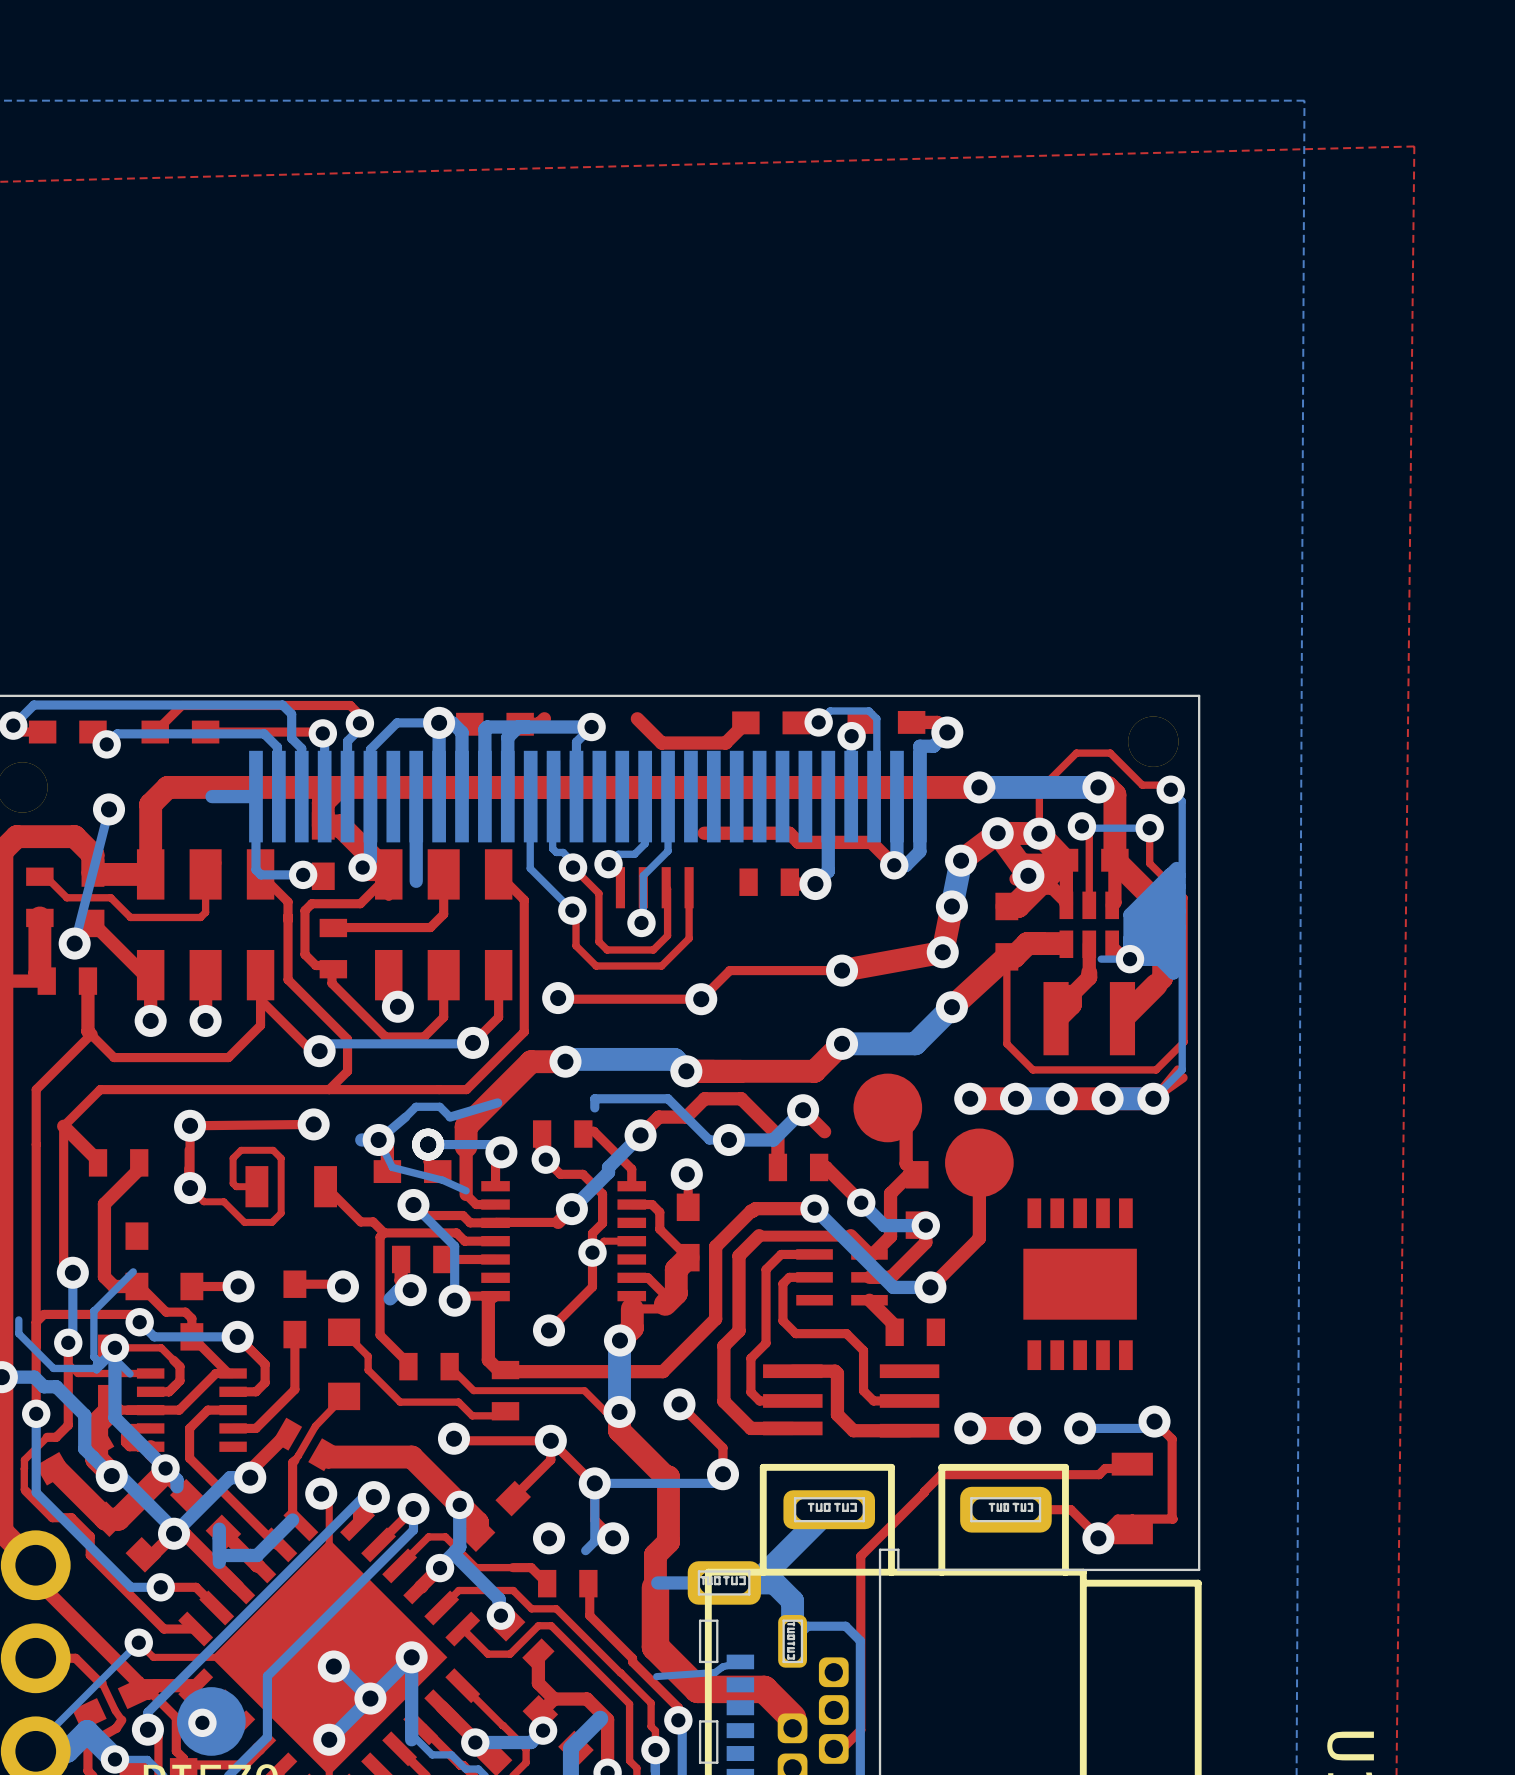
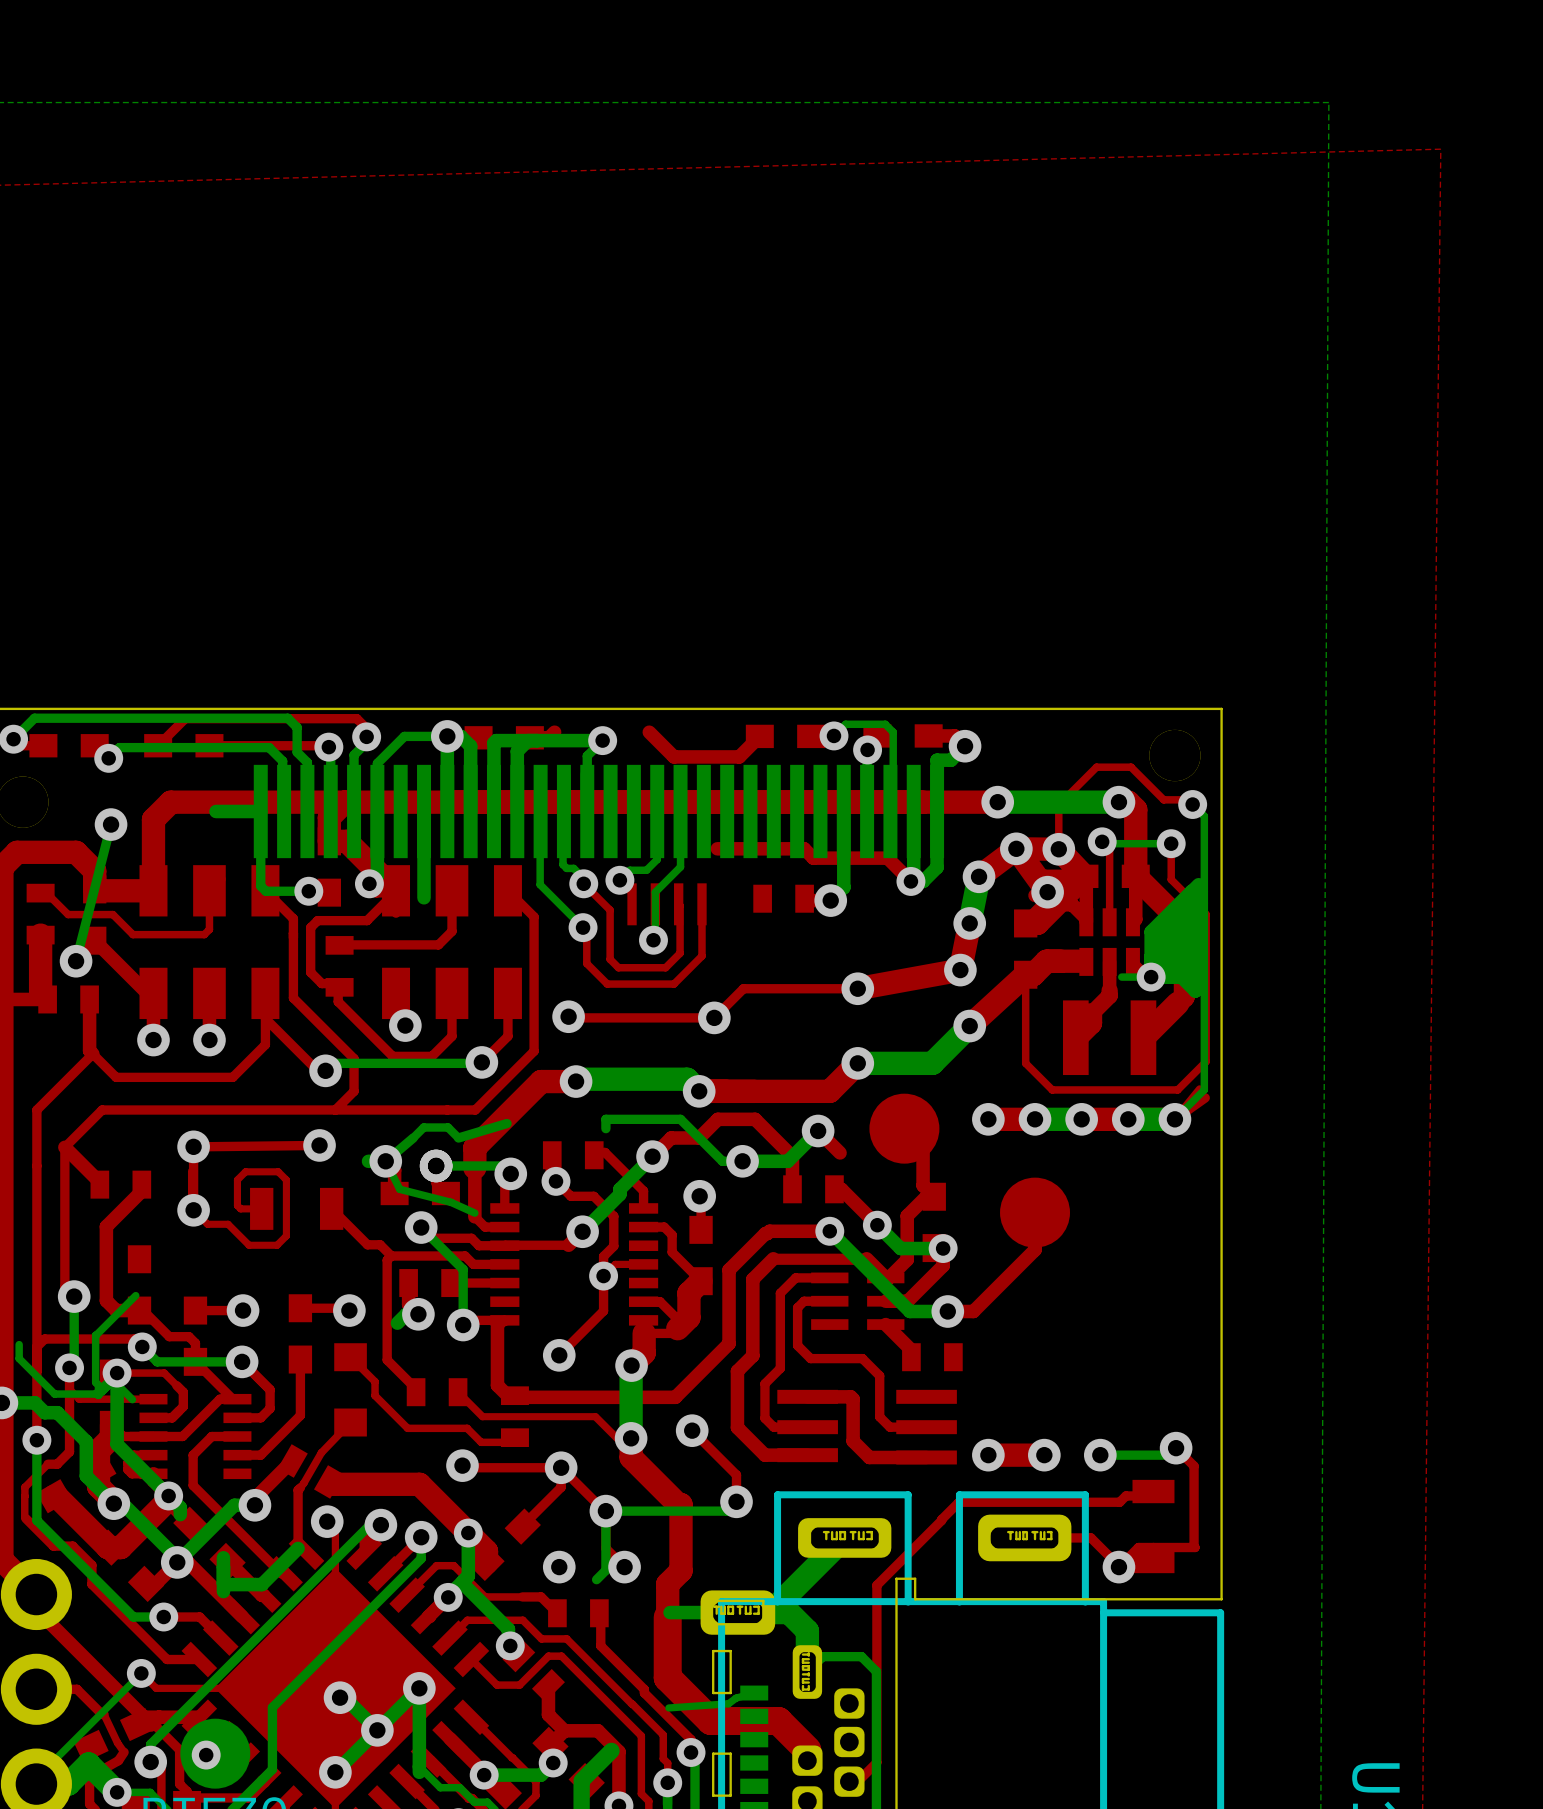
top track: (979, 1162) (979, 1238) (930, 1287) -> (1035, 1212) (1035, 1249) (973, 1311) (947, 1311)
part position: (979, 1162) -> (1035, 1212)
part: (1080, 1284) -> none

